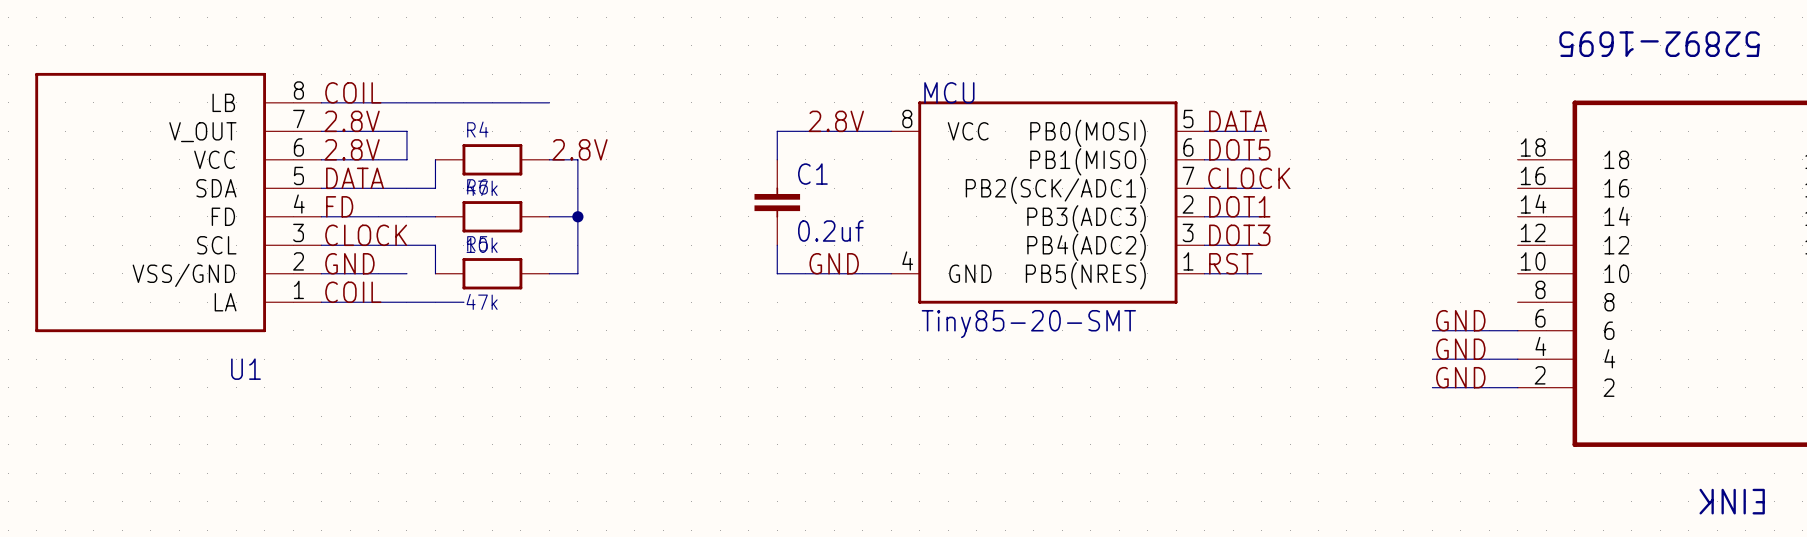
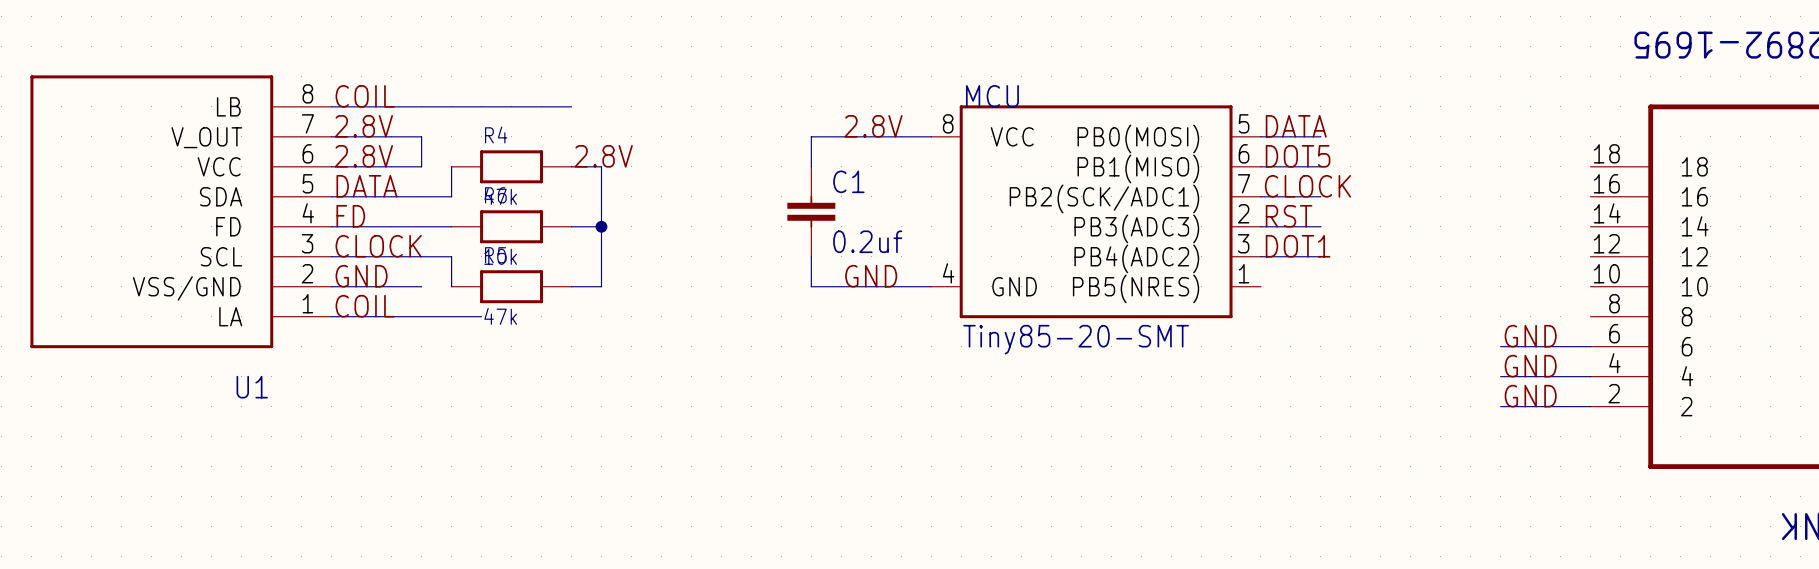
label: DOT1 (1239, 206) -> RST (1289, 216)
label: DOT3 (1239, 235) -> DOT1 (1298, 246)
label: RST (1231, 263) -> none
wire: (1204, 273) (1261, 273) -> none

